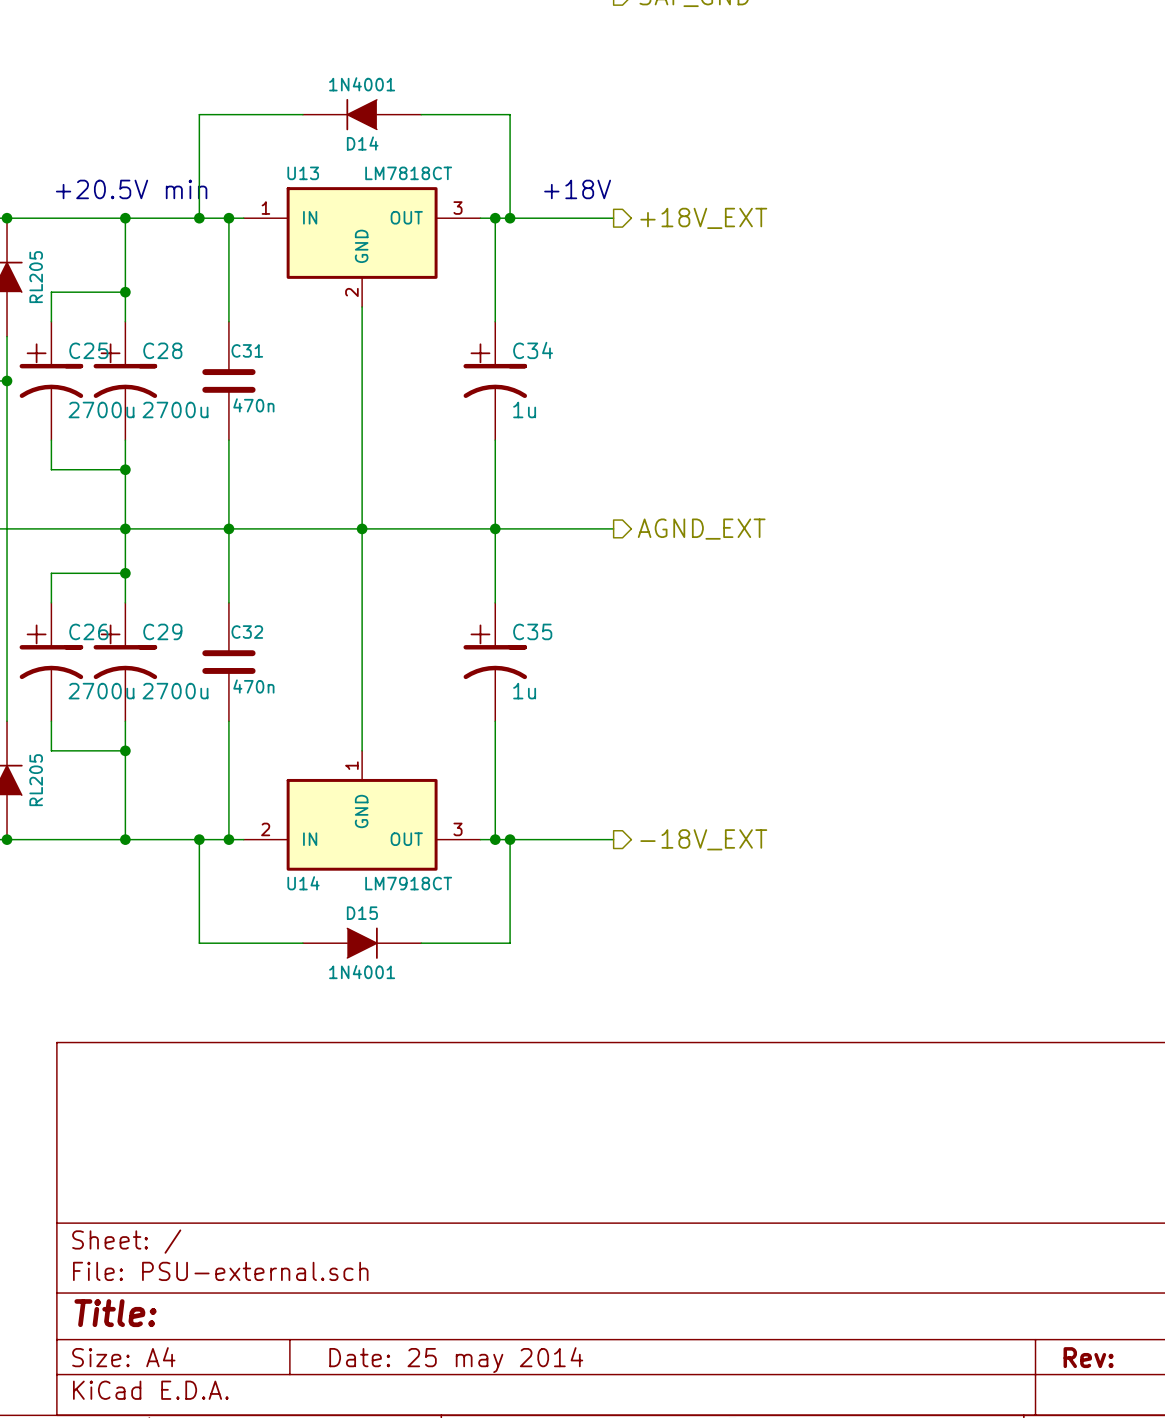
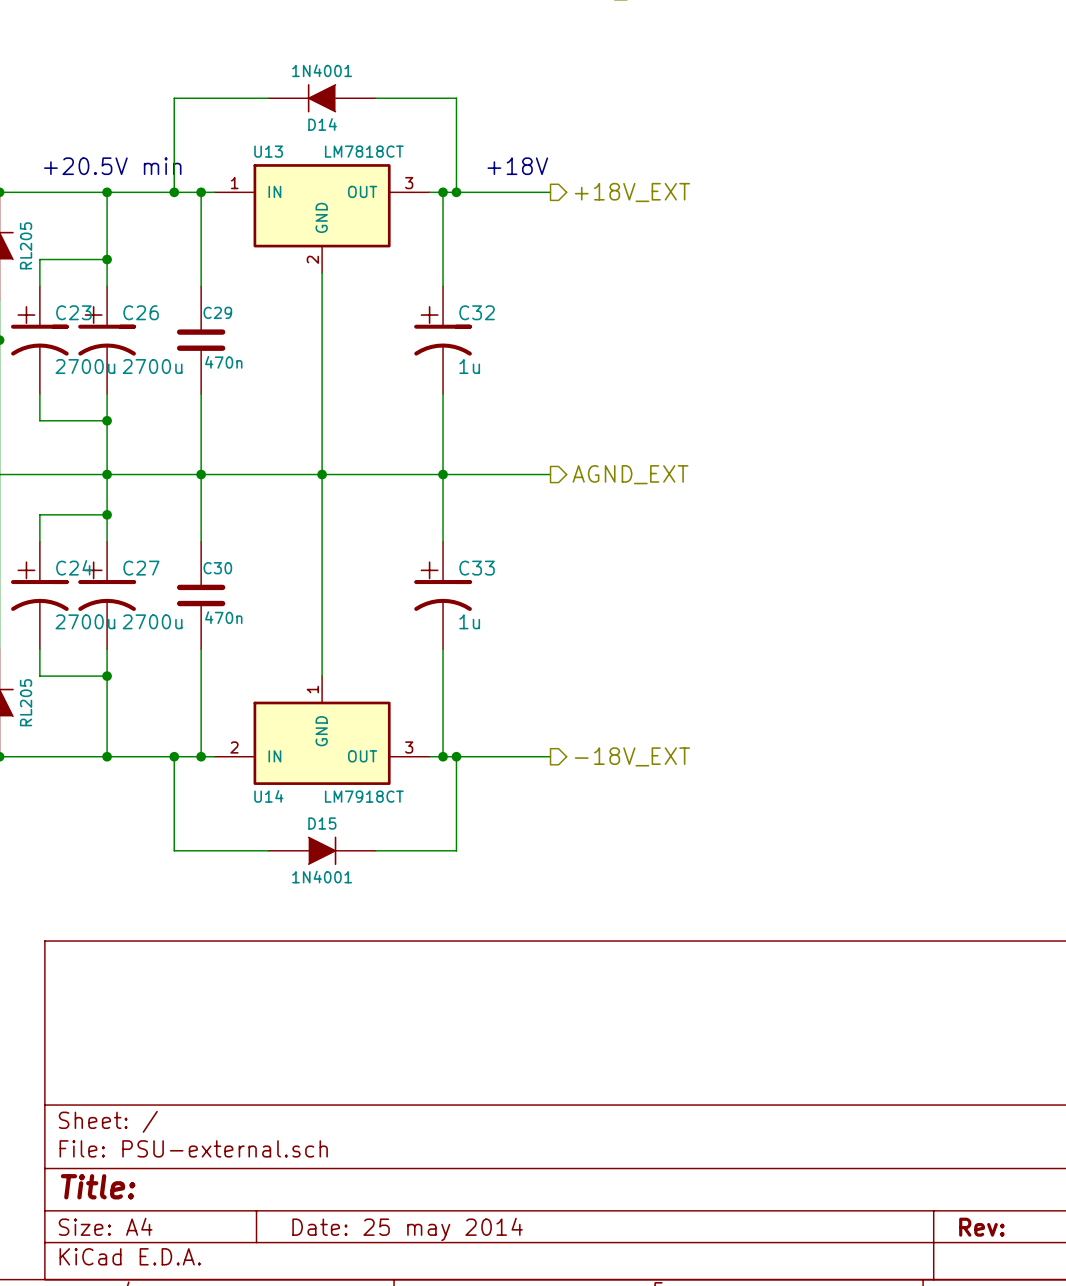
C25 name: C25 (88, 350) -> C23 (73, 312)
C28 name: C28 (162, 350) -> C26 (141, 312)
C31 name: C31 (247, 350) -> C29 (217, 312)
C34 name: C34 (533, 350) -> C32 (477, 312)
C26 name: C26 (88, 631) -> C24 (74, 567)
C29 name: C29 (162, 631) -> C27 (141, 568)
C35 name: C35 (532, 631) -> C33 (477, 568)
C32 name: C32 (247, 632) -> C30 (217, 568)

